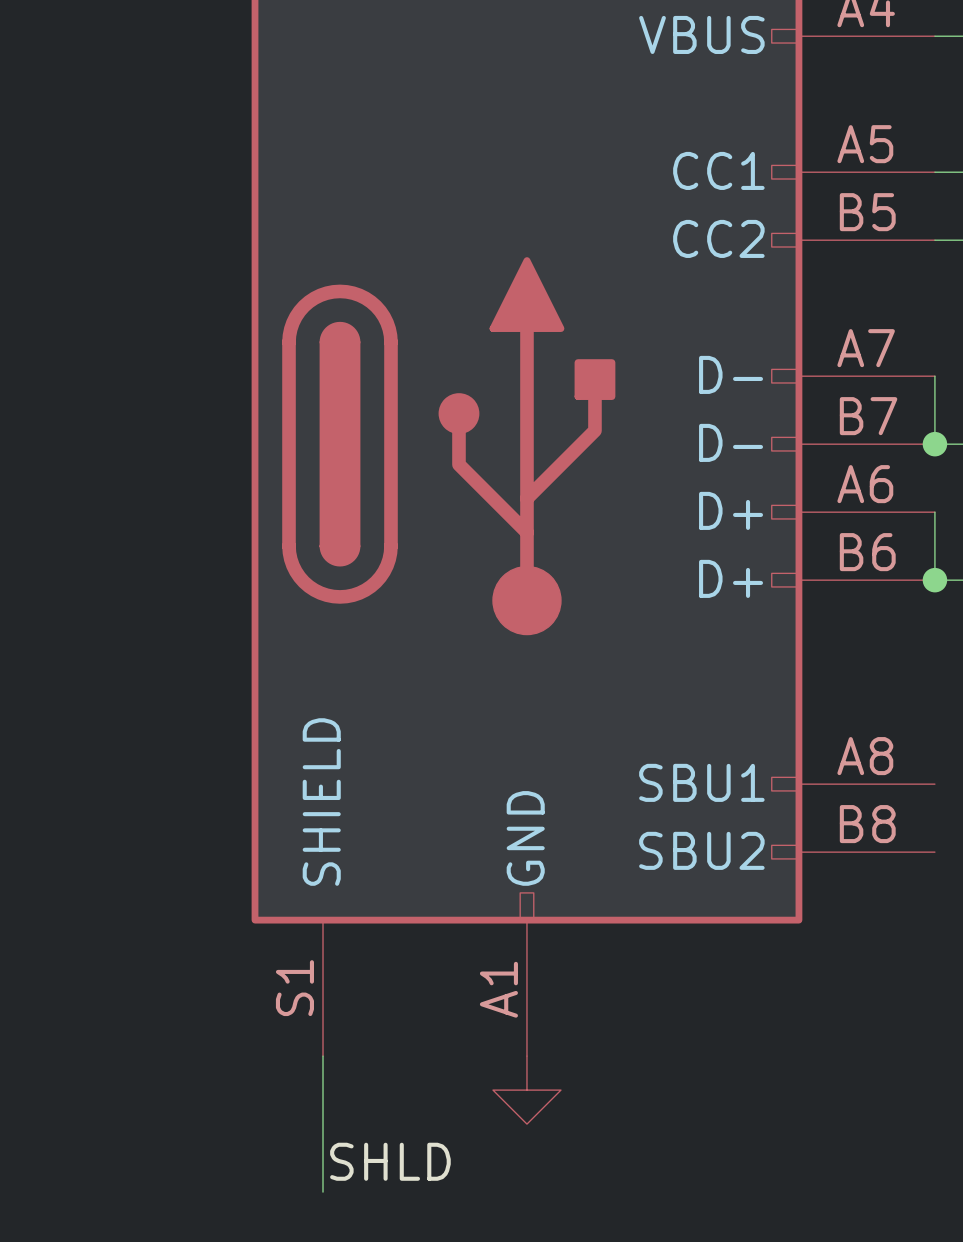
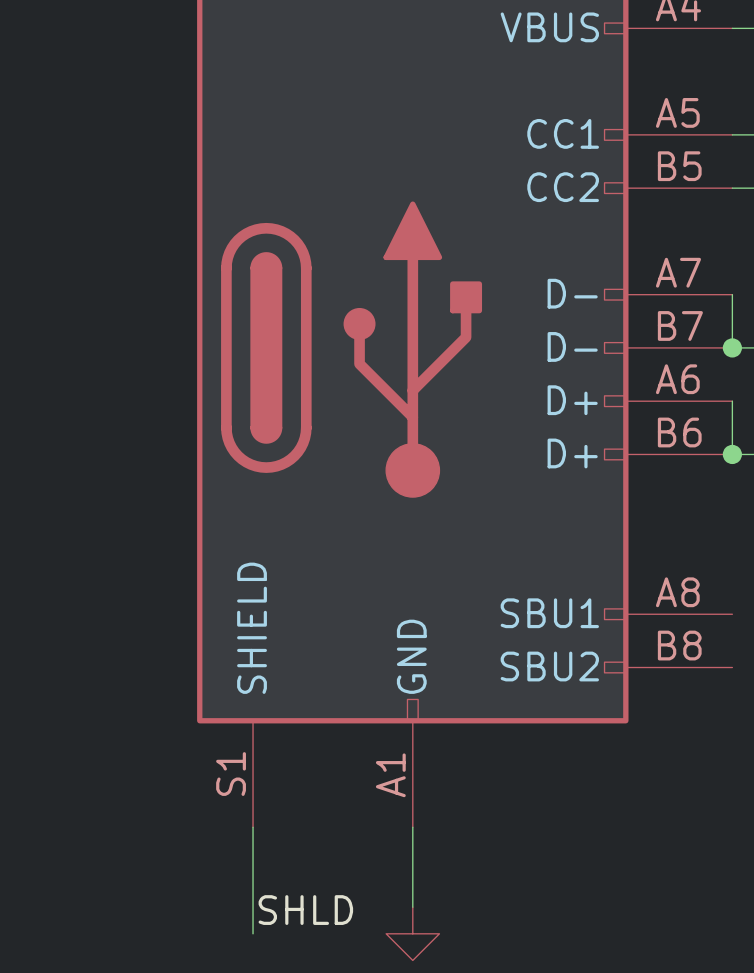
wire: none -> (412, 827) (412, 907)
power symbol position: (526, 1090) -> (412, 933)

